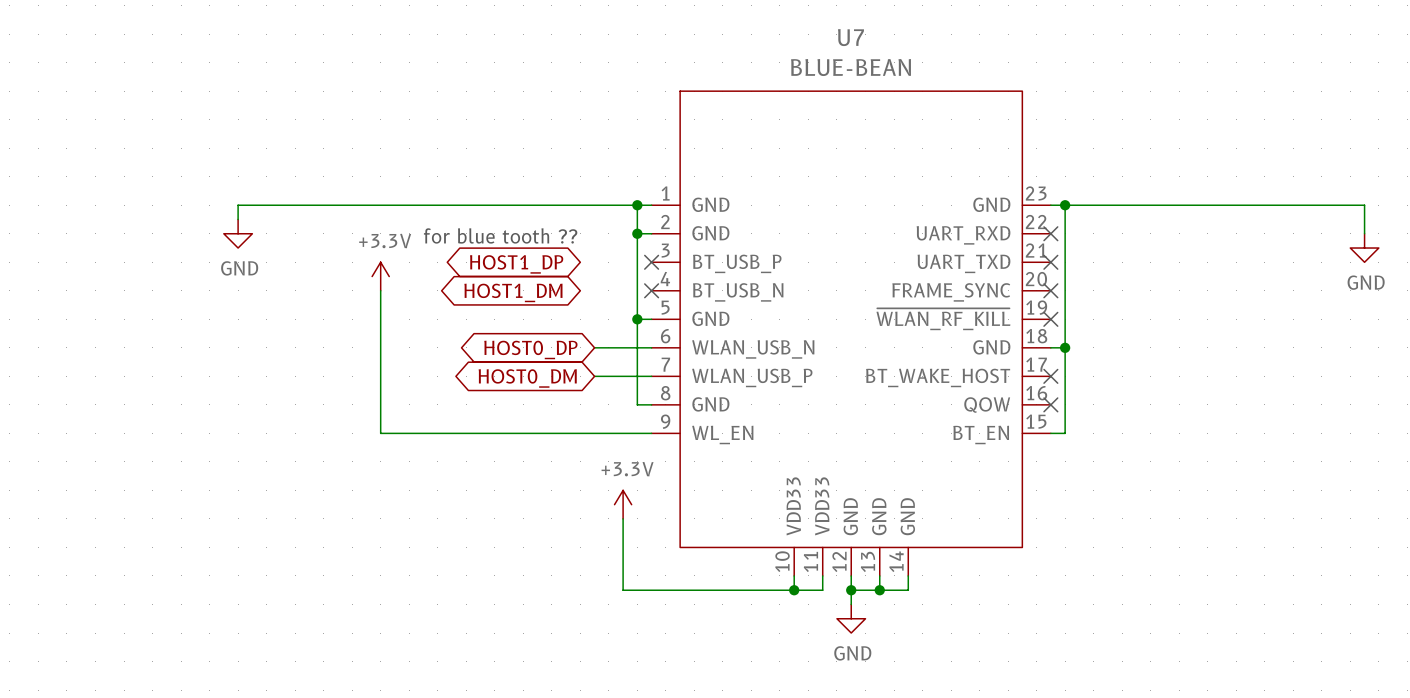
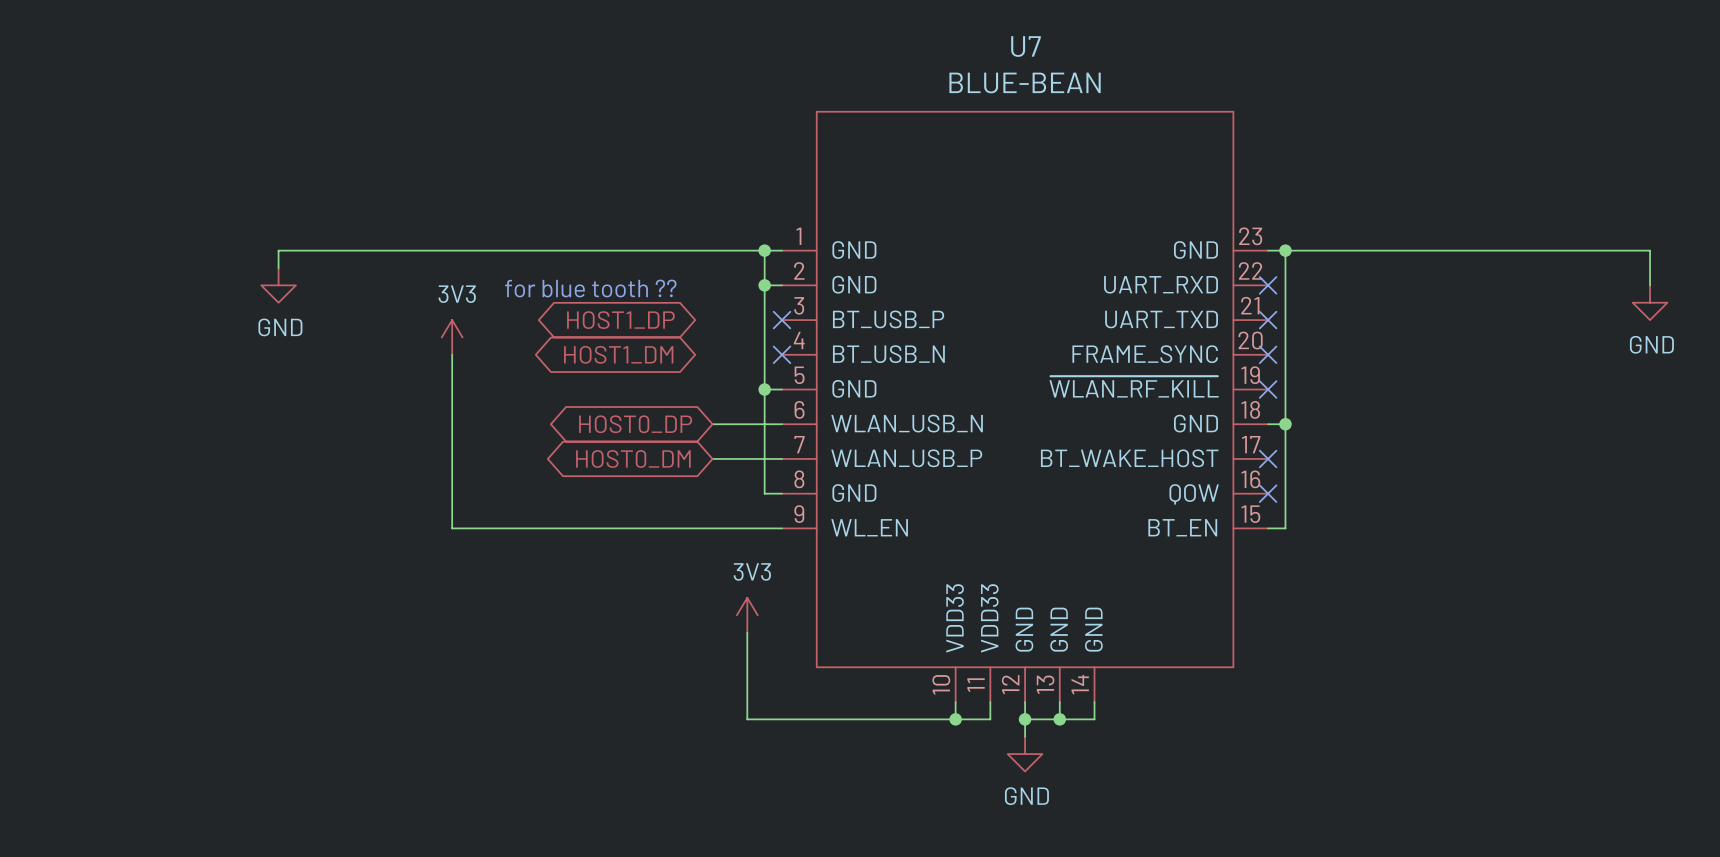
power symbol: +3.3V (380, 276) -> 3V3 (452, 337)
power symbol: +3.3V (623, 504) -> 3V3 (747, 615)

